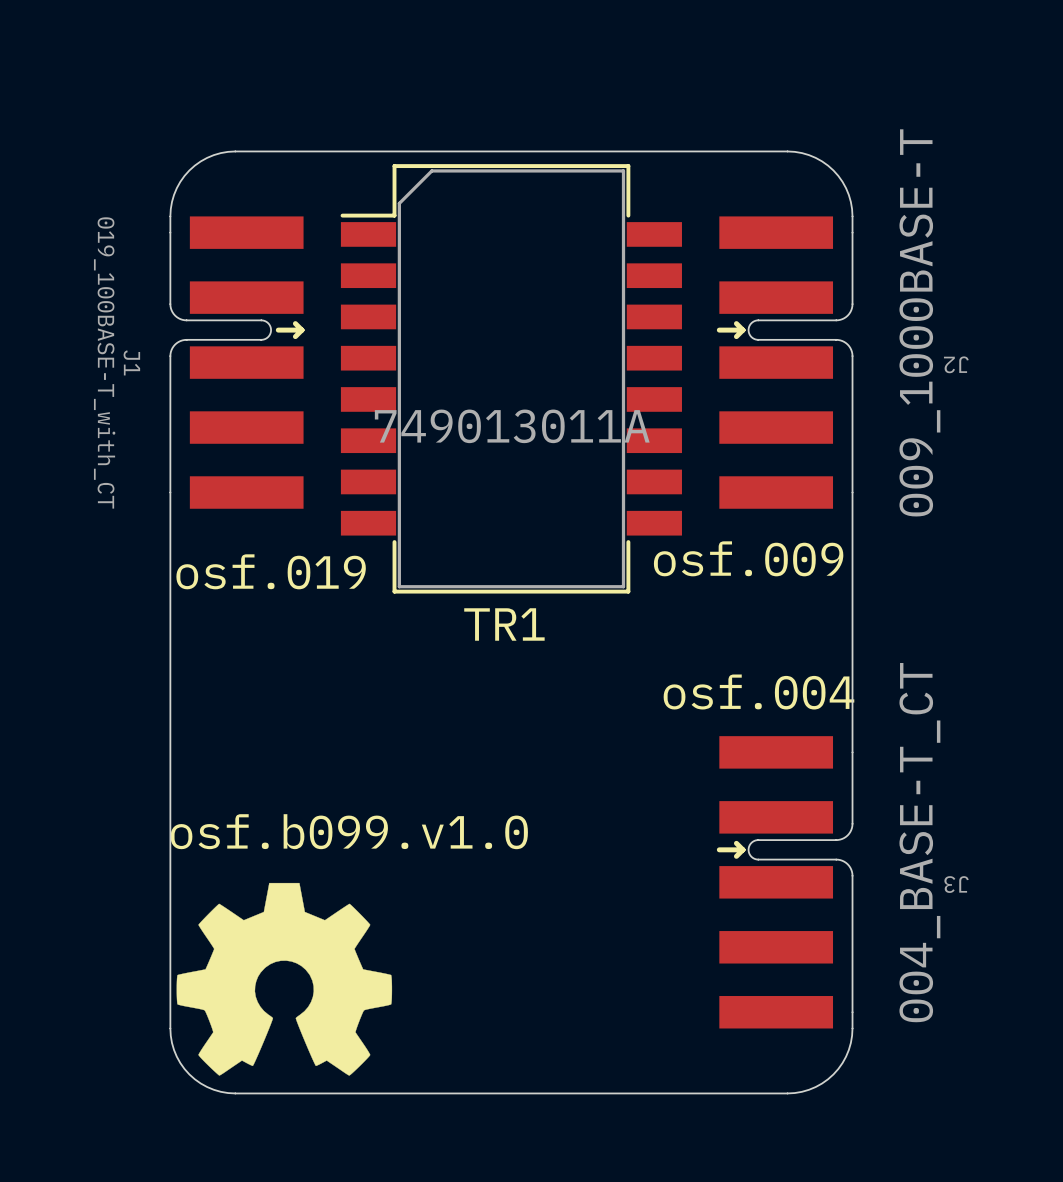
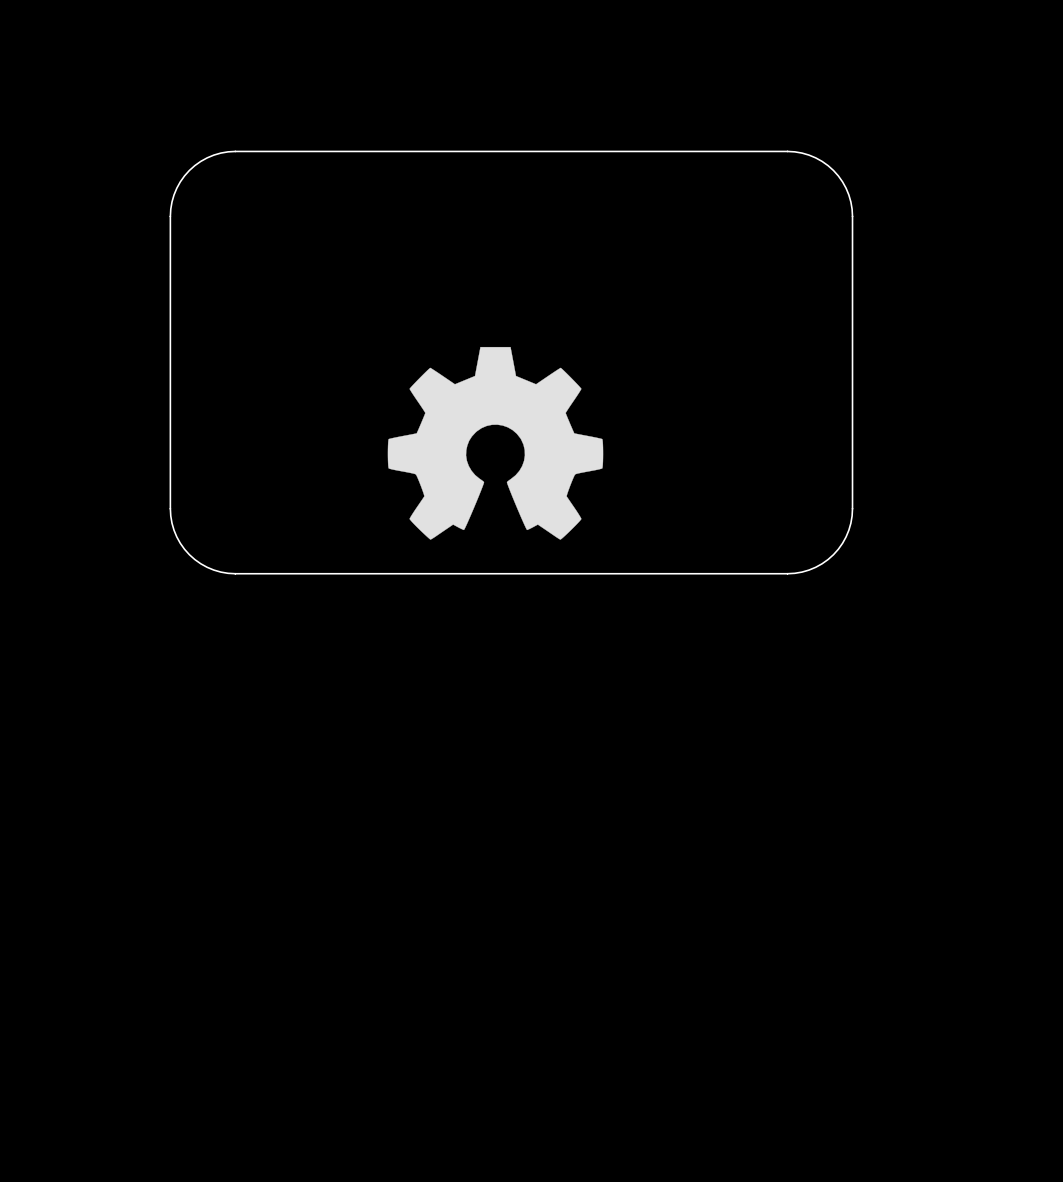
board edge: none -> (170, 232) (170, 492)
board edge: none -> (852, 232) (852, 492)
J1: 019_100BASE-T_with_CT (236, 362) -> none
J2: 009_1000BASE-T (785, 362) -> none
TR1: 749013011A (511, 378) -> none
board edge: (170, 508) (170, 1028) (172, 1042) (176, 1056) (184, 1068) (194, 1079) (213, 1089) (235, 1093) (794, 1093) (815, 1087) (828, 1079) (838, 1068) (846, 1056) (850, 1042) (852, 1012) -> (170, 508) (172, 523) (176, 536) (189, 554) (200, 563) (213, 570) (235, 573) (794, 573) (815, 567) (828, 559) (838, 549) (848, 530) (852, 508)
board edge: (852, 508) (852, 752) -> none
text: osf.009 (748, 558) -> none
text: osf.019 (271, 571) -> none
text: osf.004 (758, 692) -> none
text: osf.b099.v1.0 (349, 831) -> none
J3: 004_BASE-T_CT (785, 882) -> none
drawing position: (284, 979) -> (495, 443)

